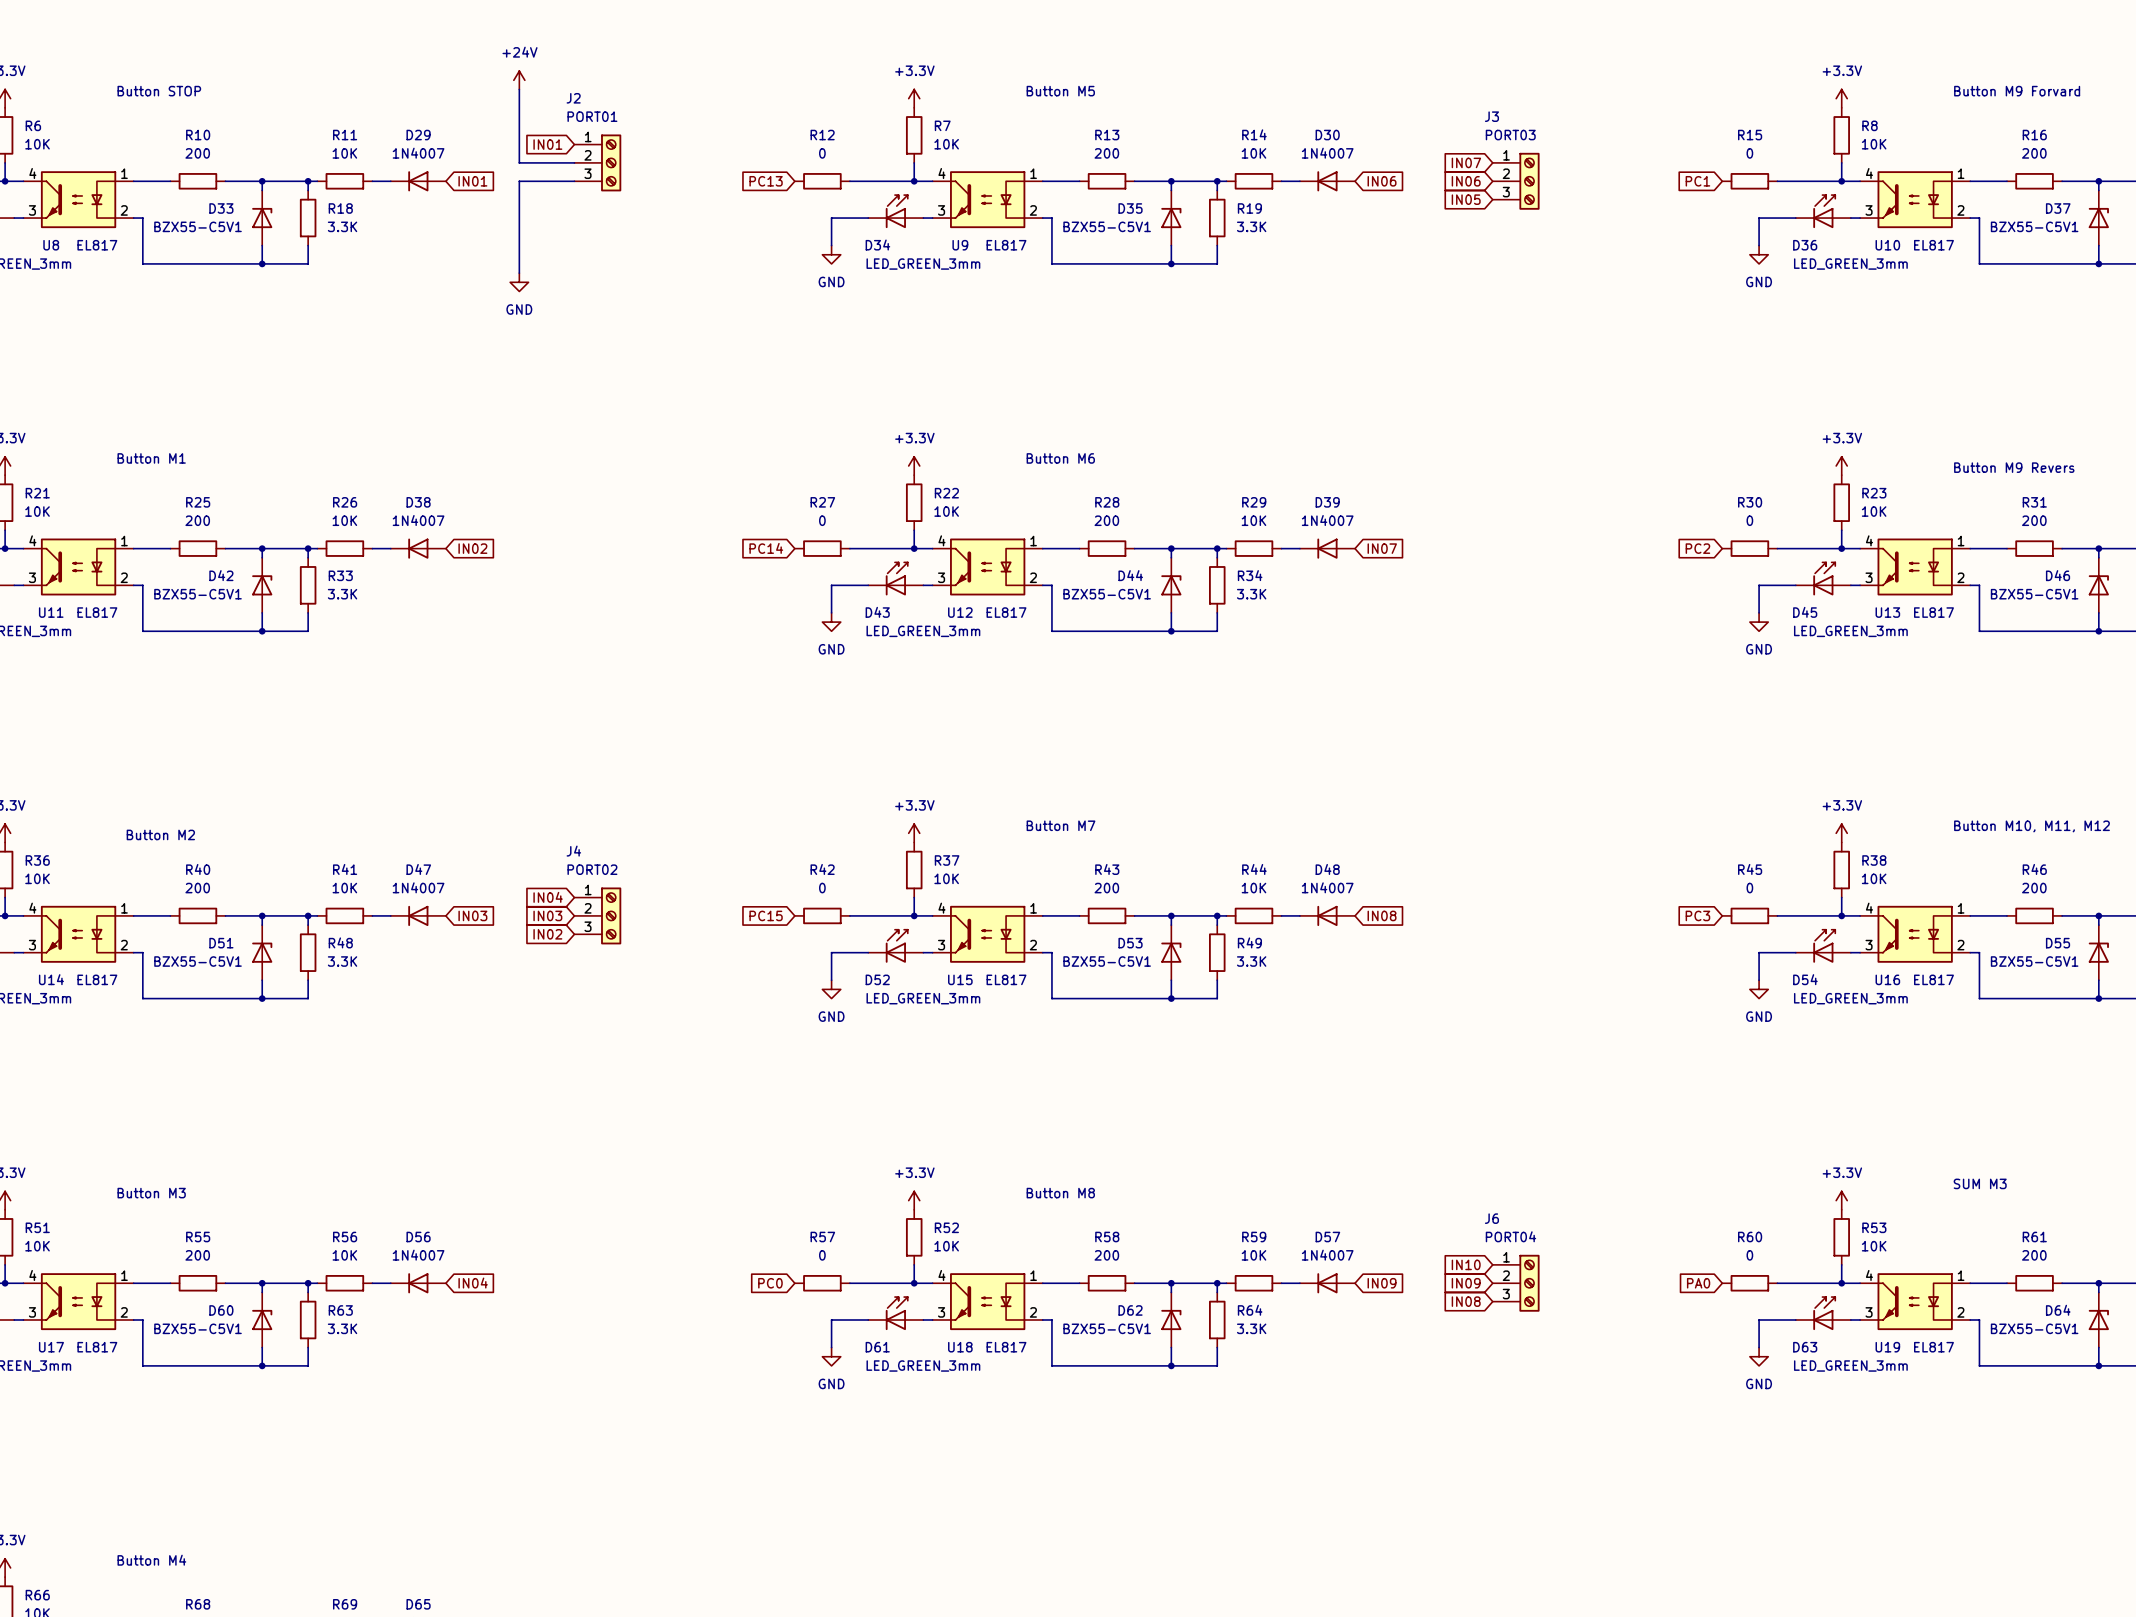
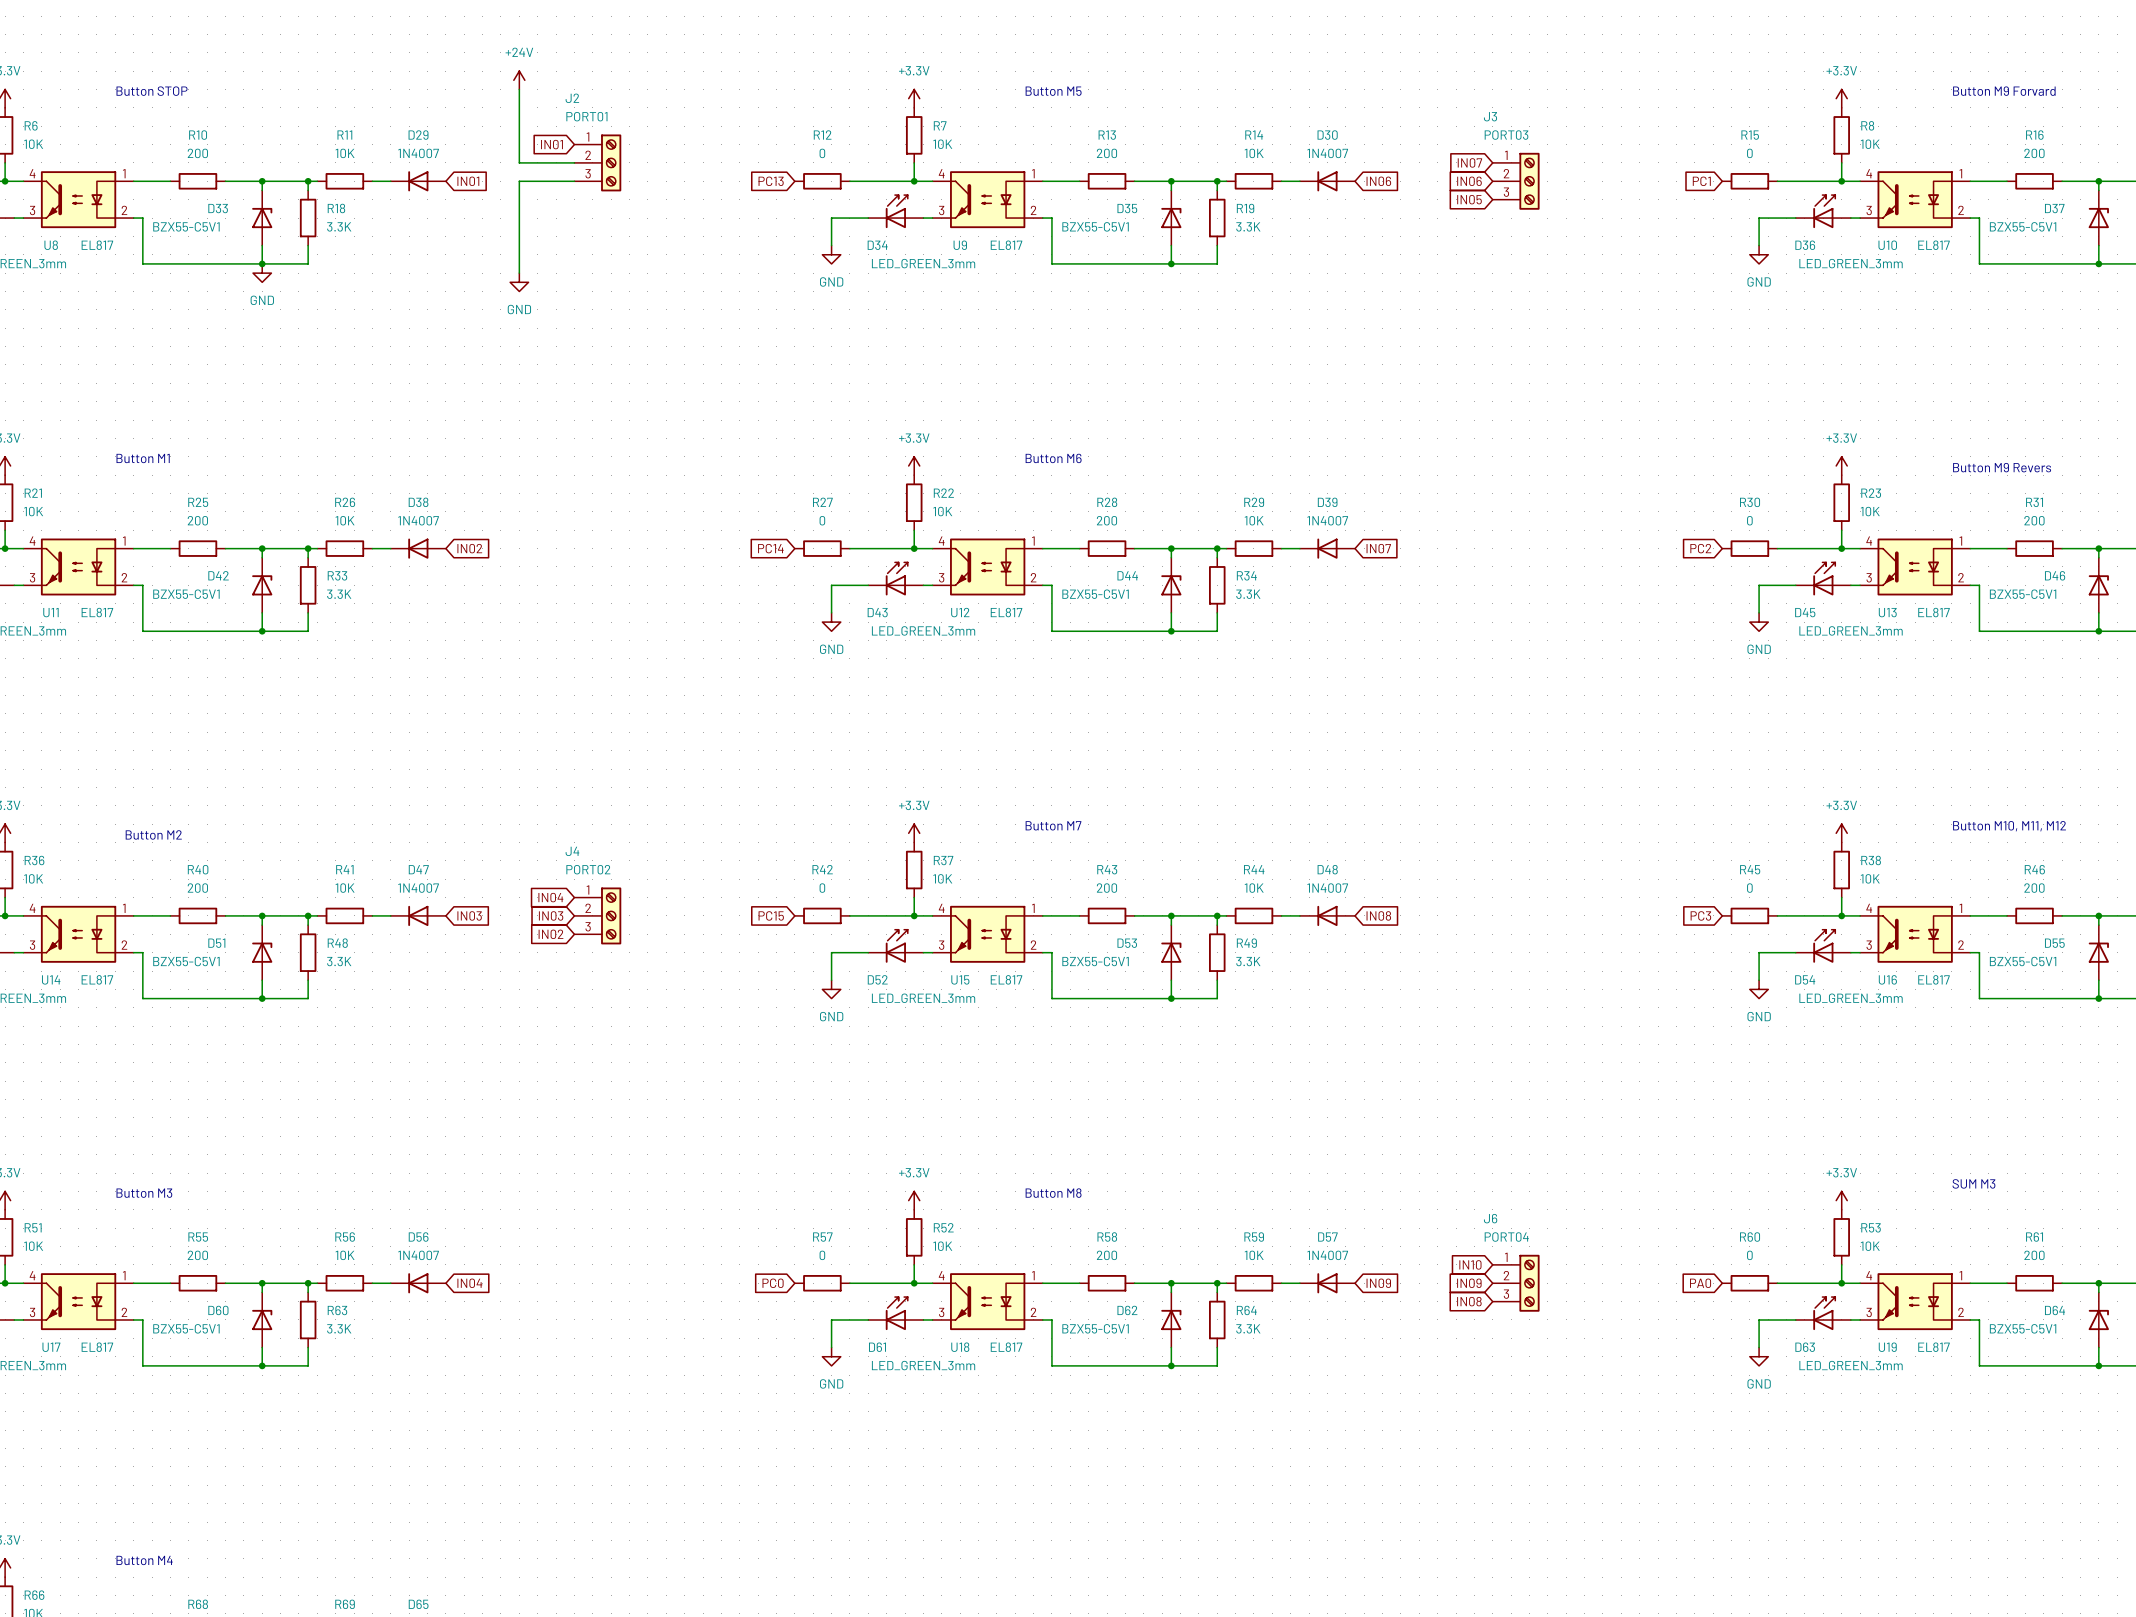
power symbol: none -> GND (262, 273)

